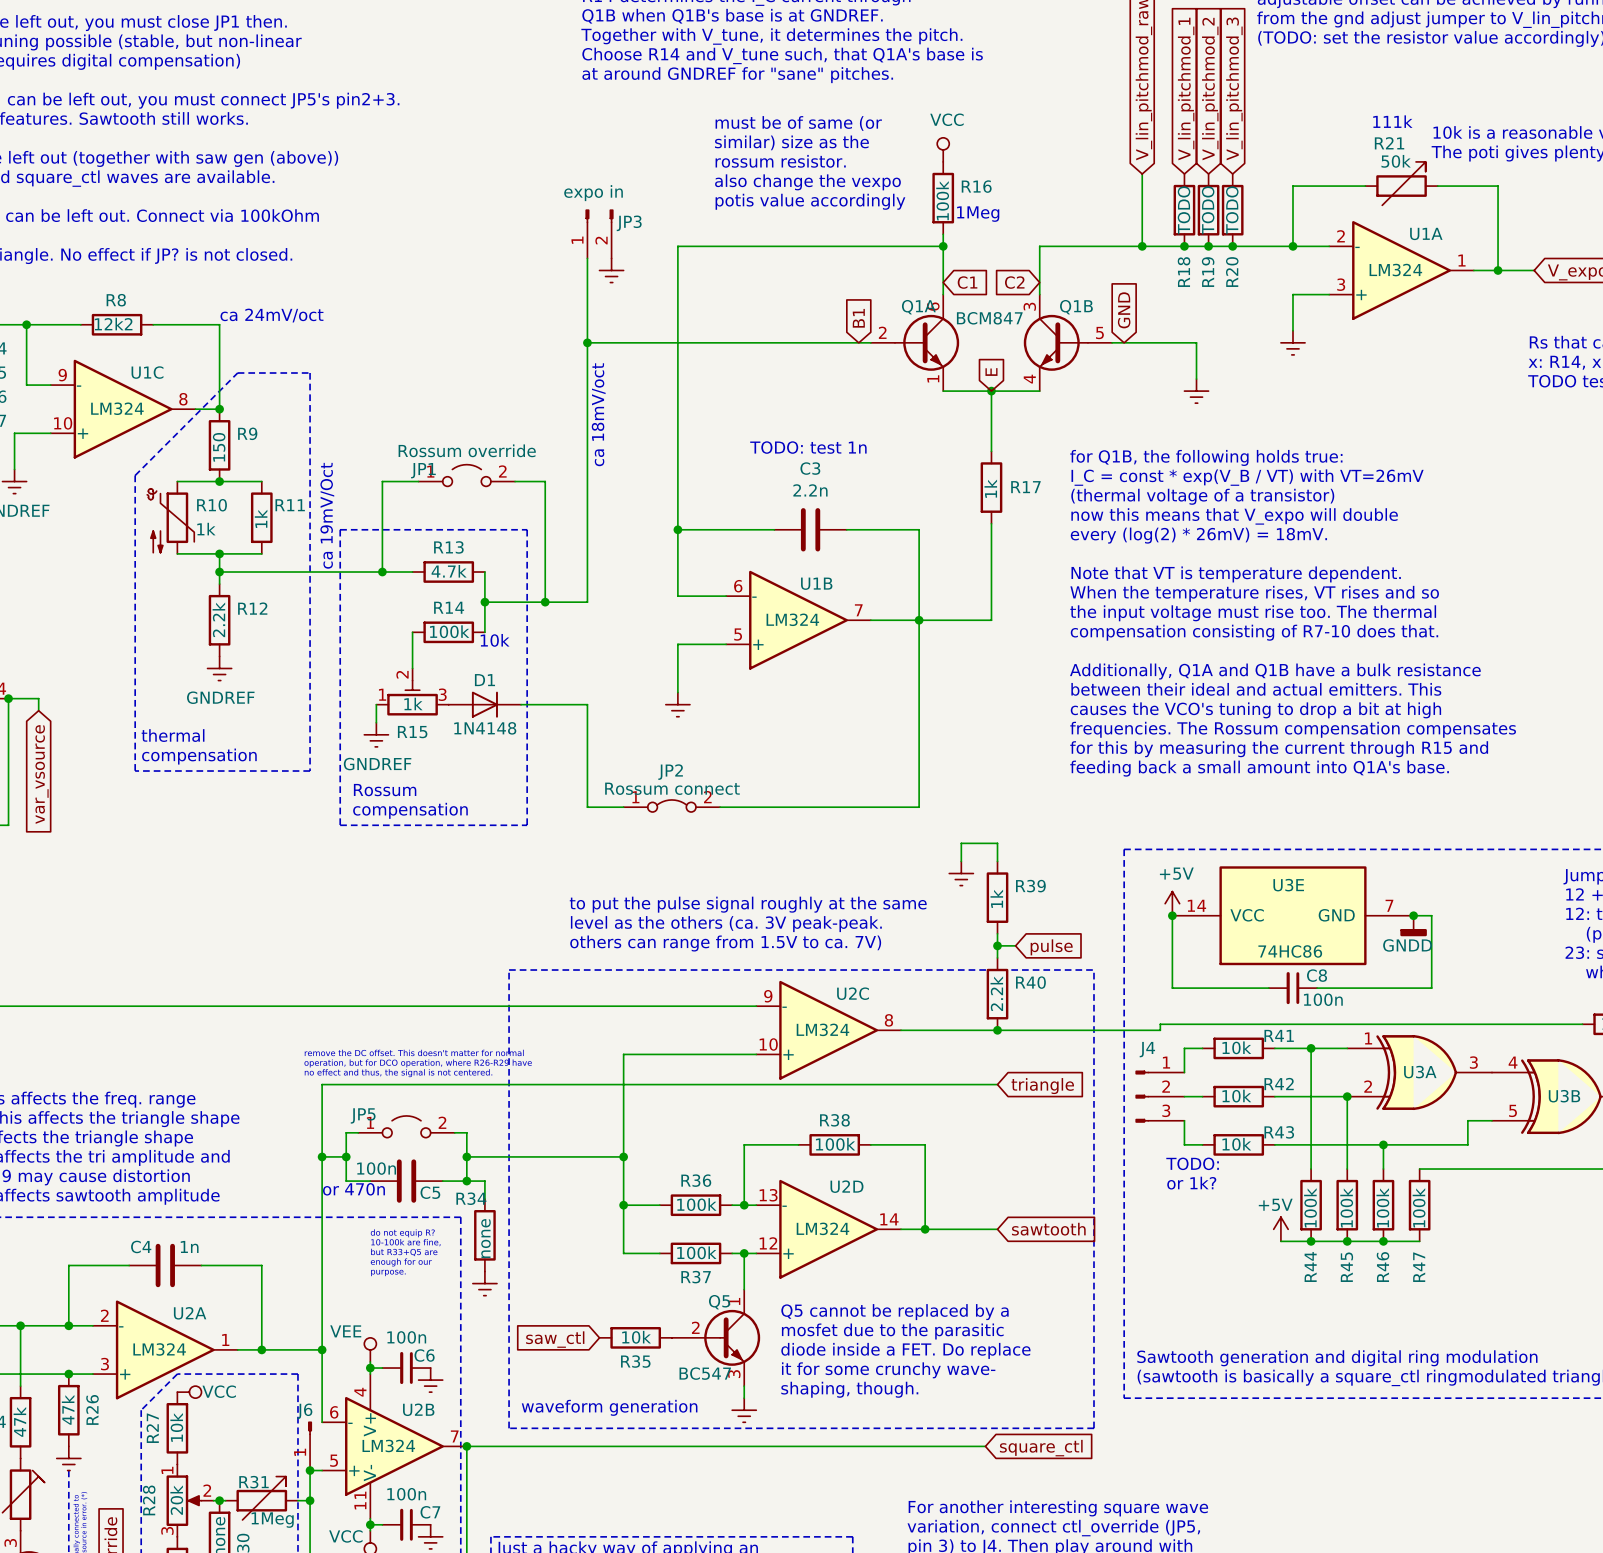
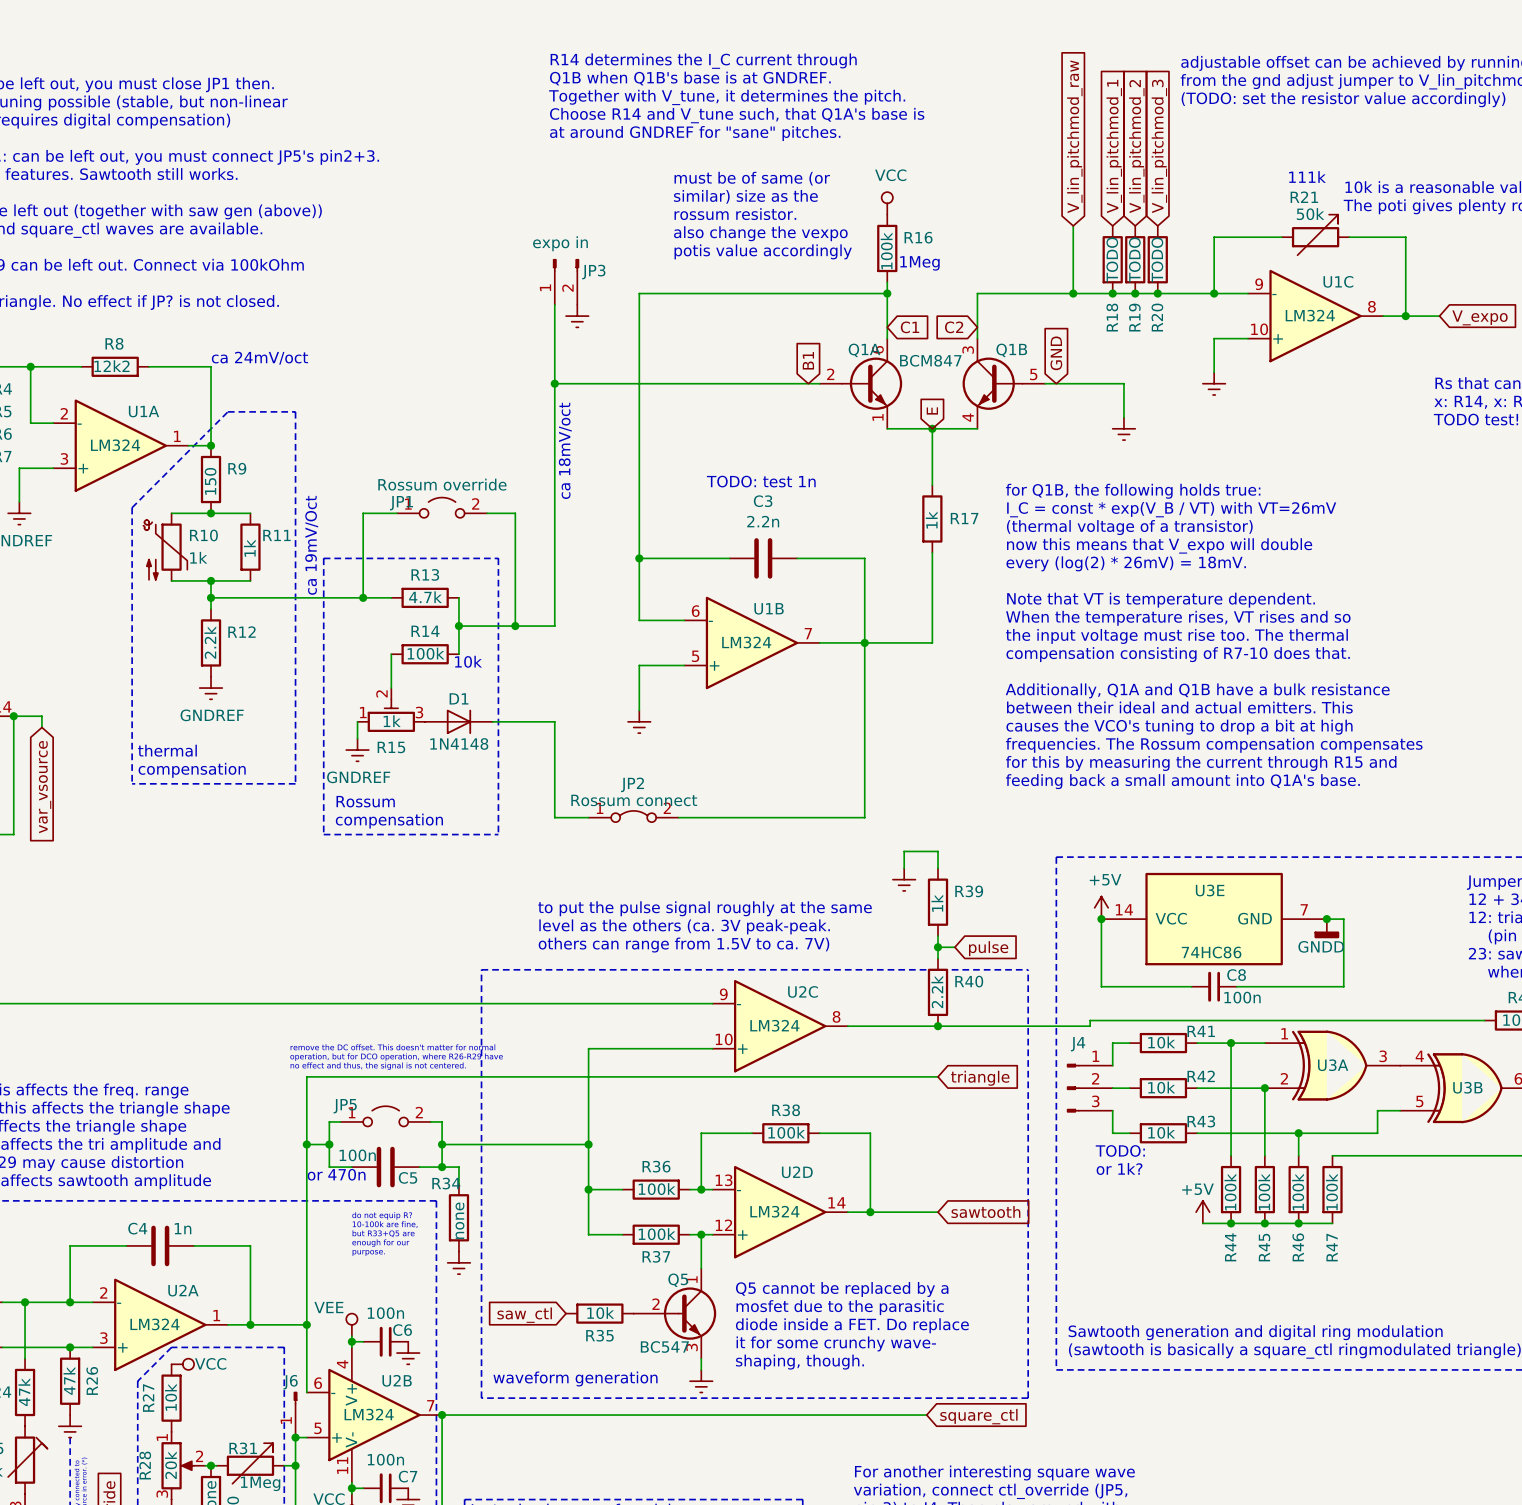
U1A position: (1401, 270) -> (120, 445)
U1C position: (123, 409) -> (1315, 316)

